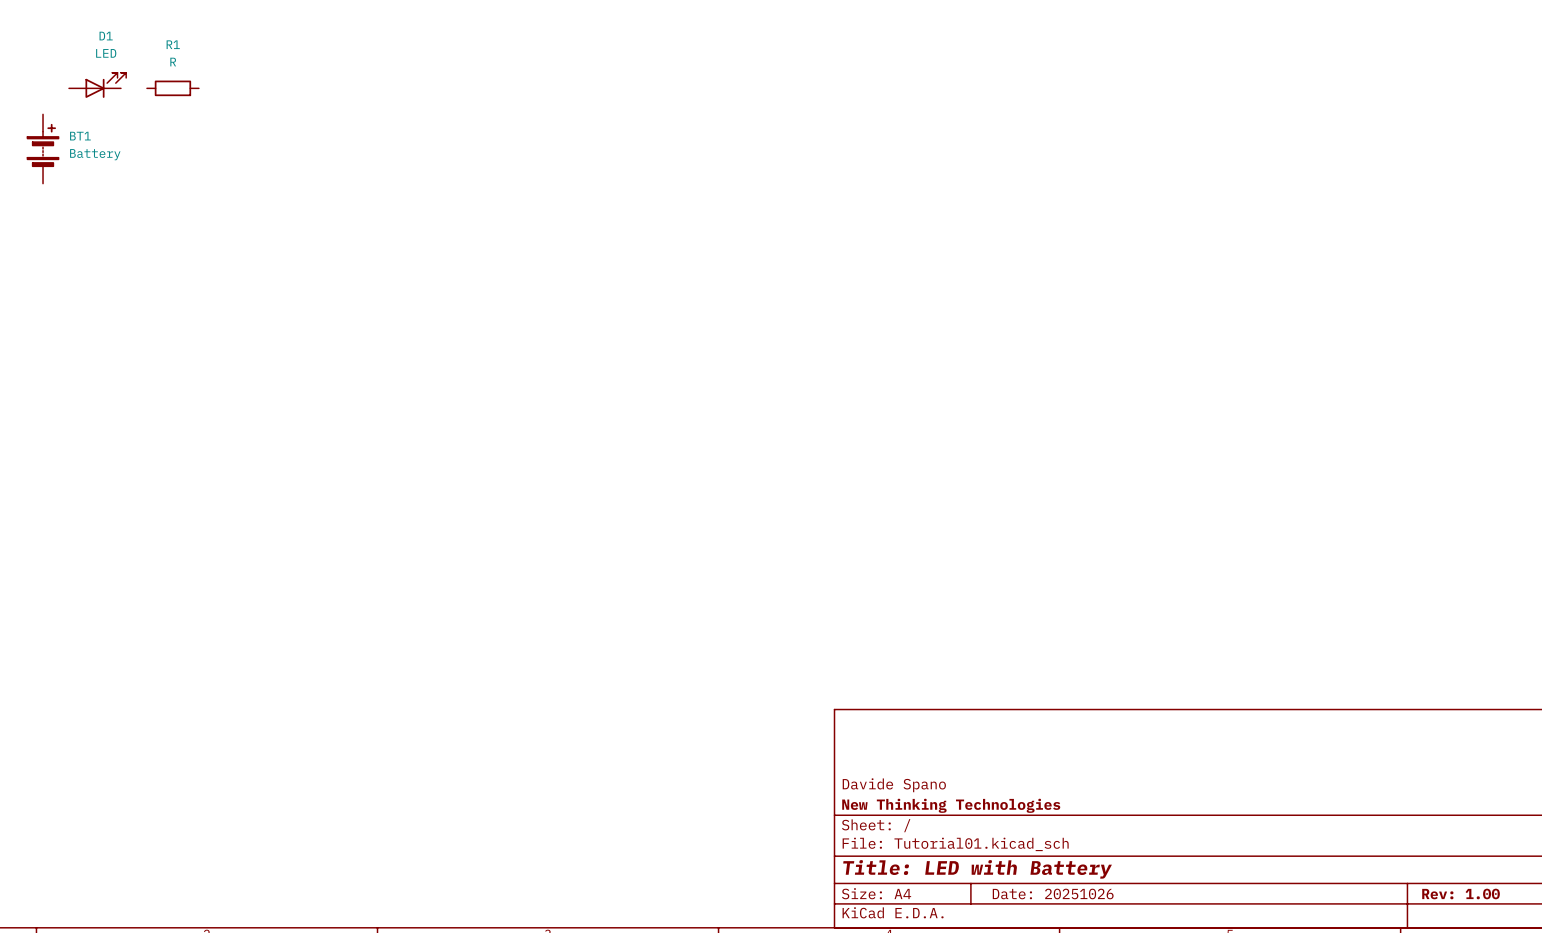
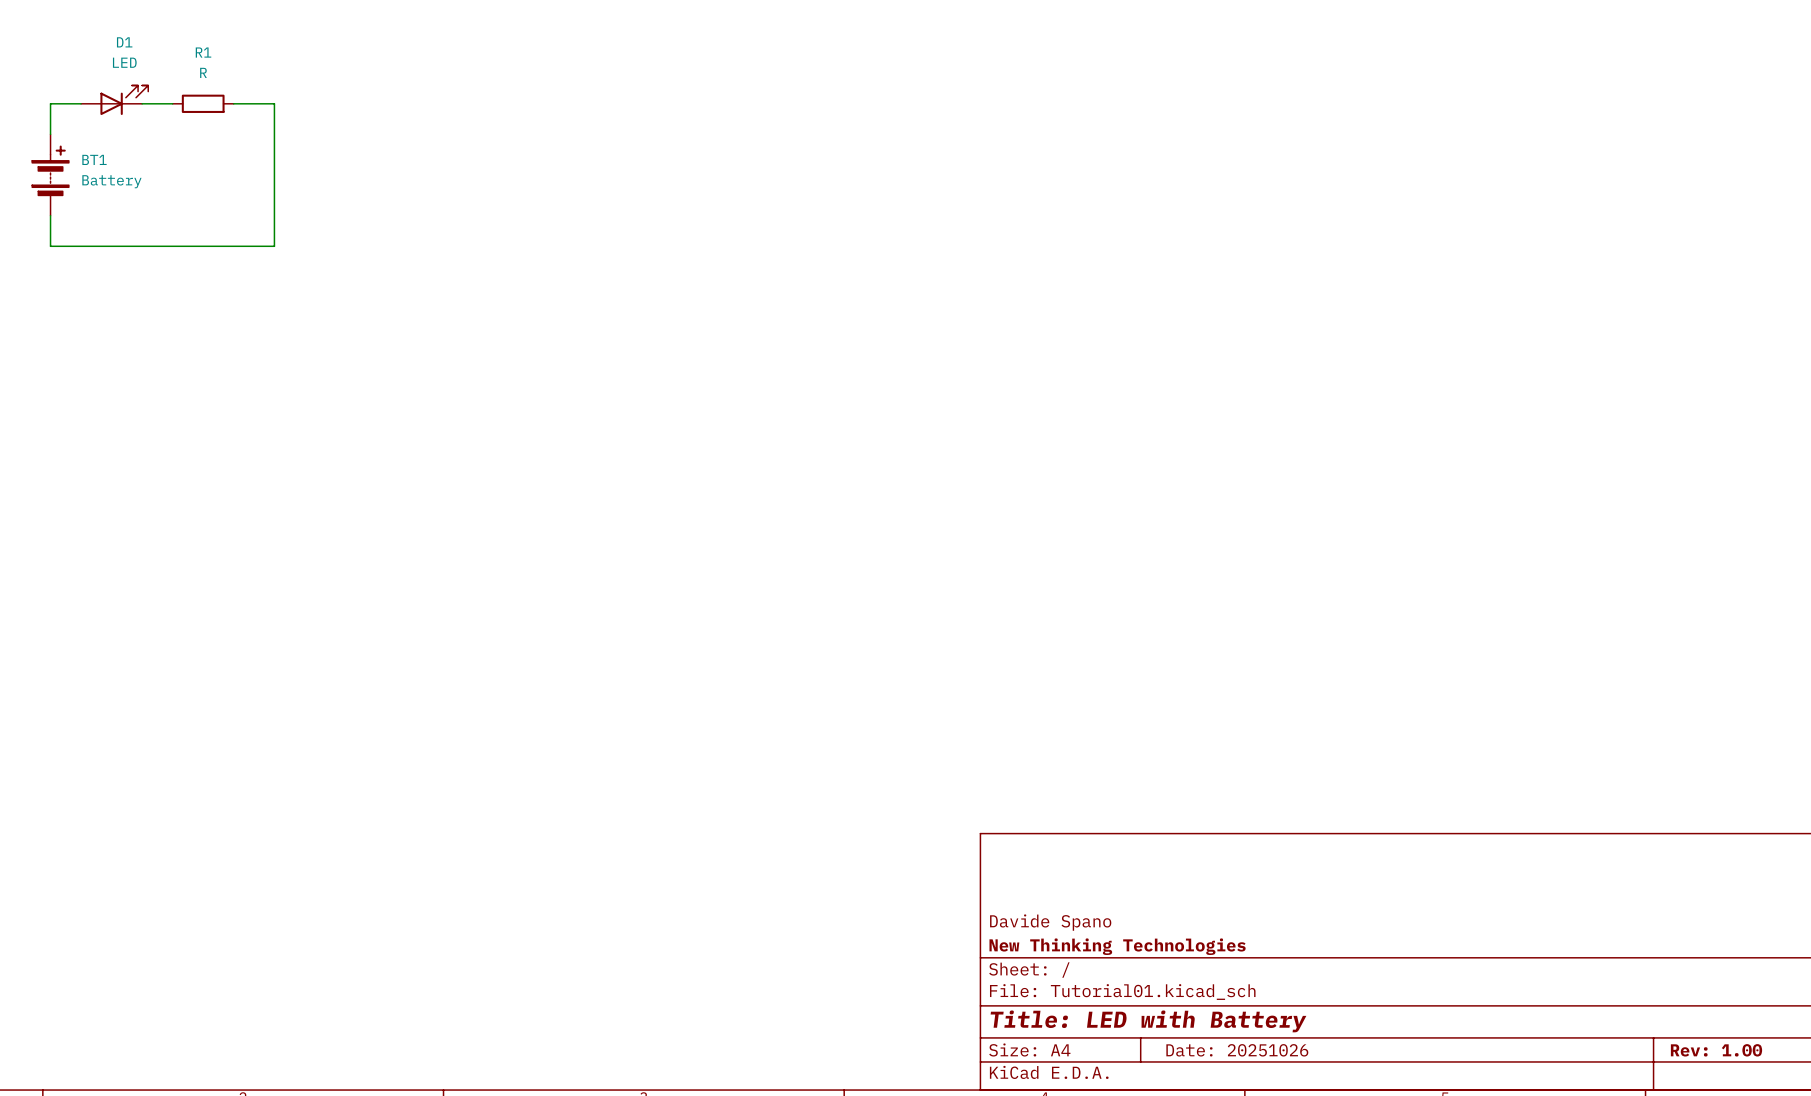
wire: none -> (81, 103) (50, 103) (50, 134)
wire: none -> (142, 103) (172, 103)
wire: none -> (233, 103) (274, 103) (274, 246) (50, 246) (50, 215)

